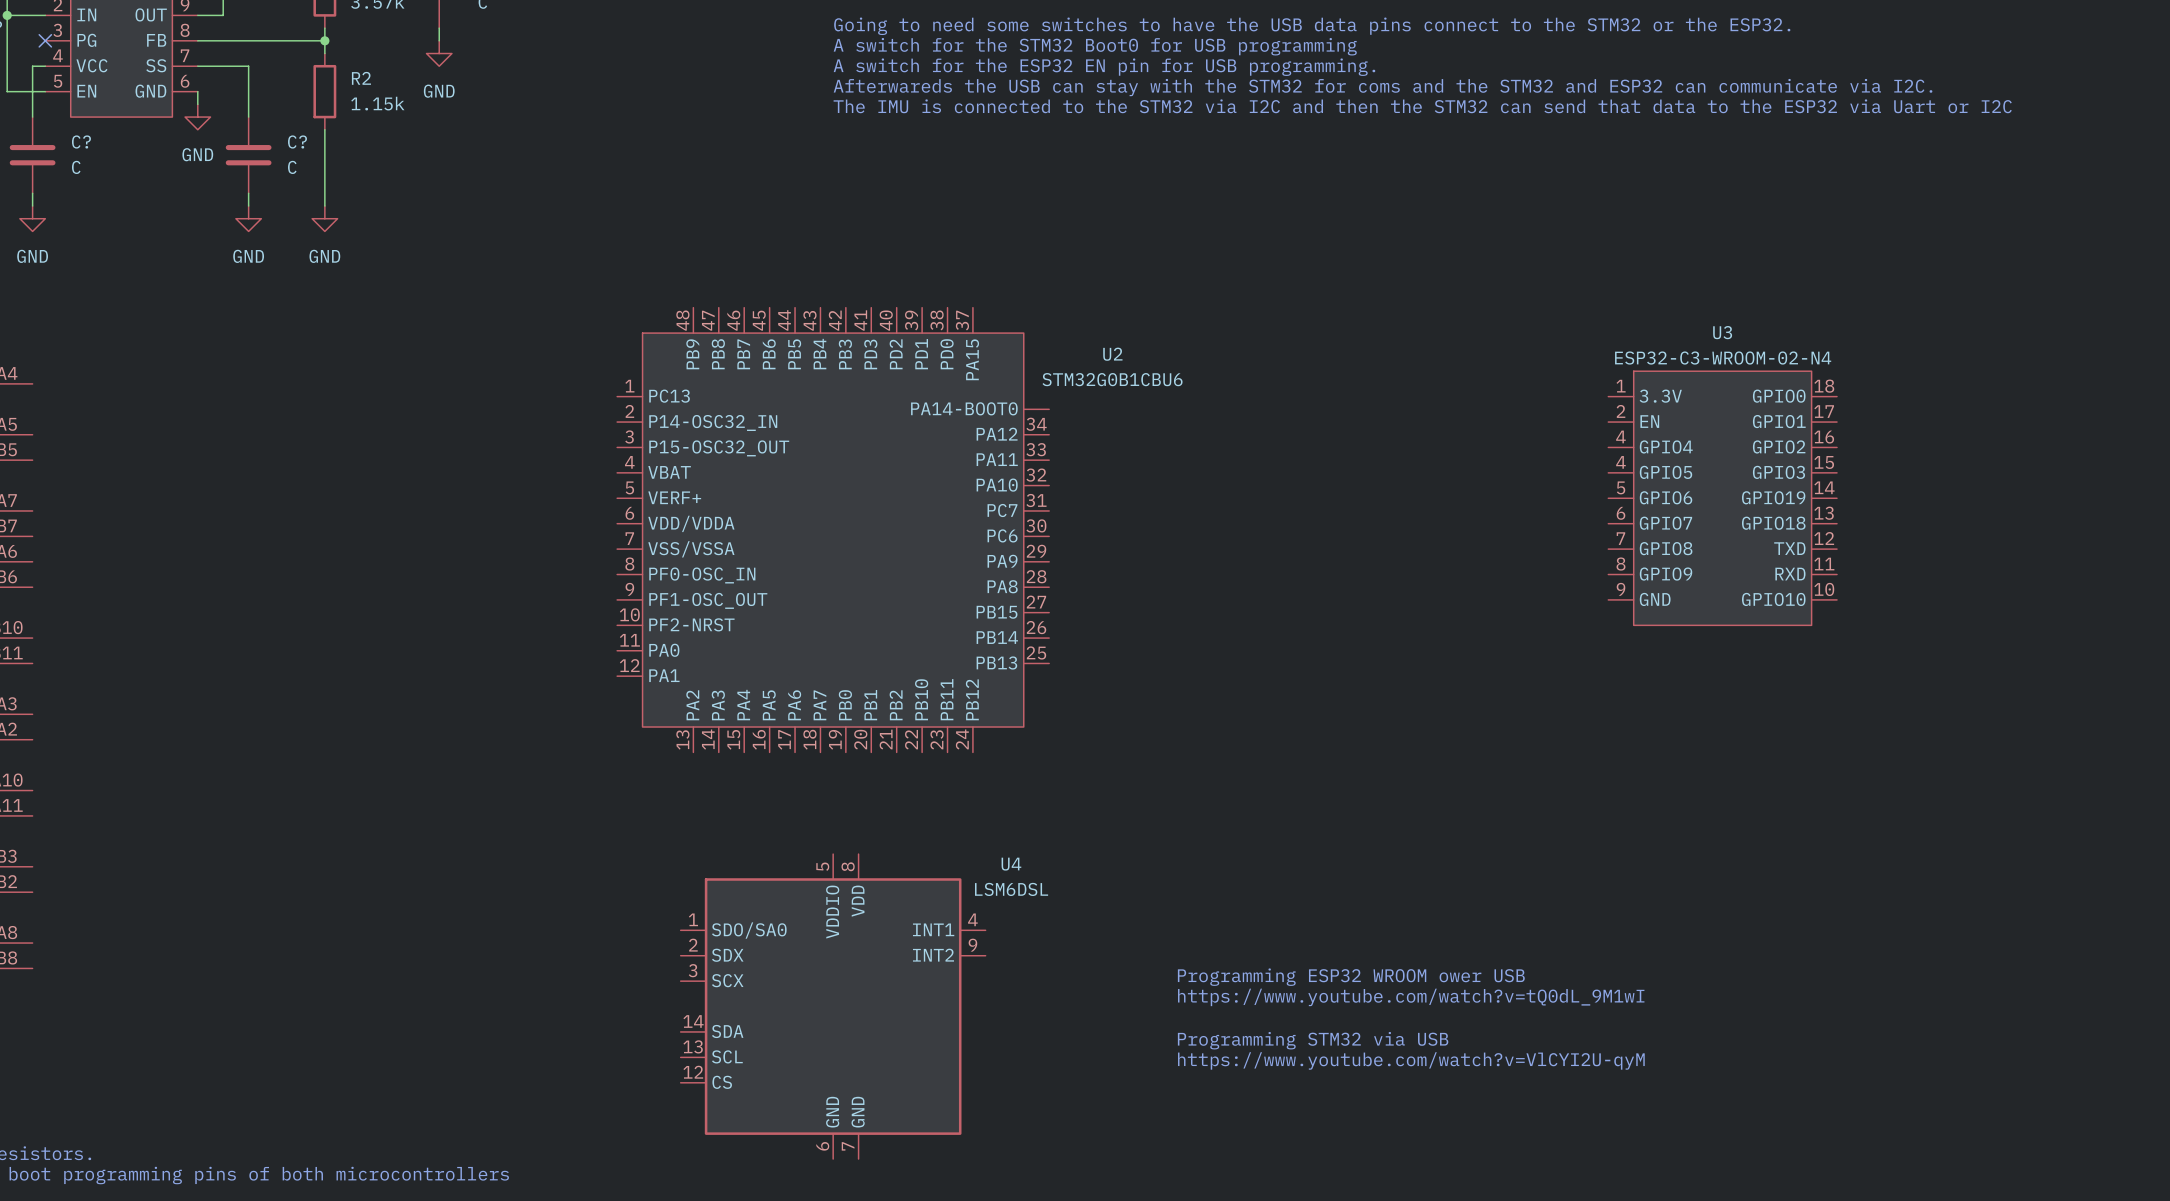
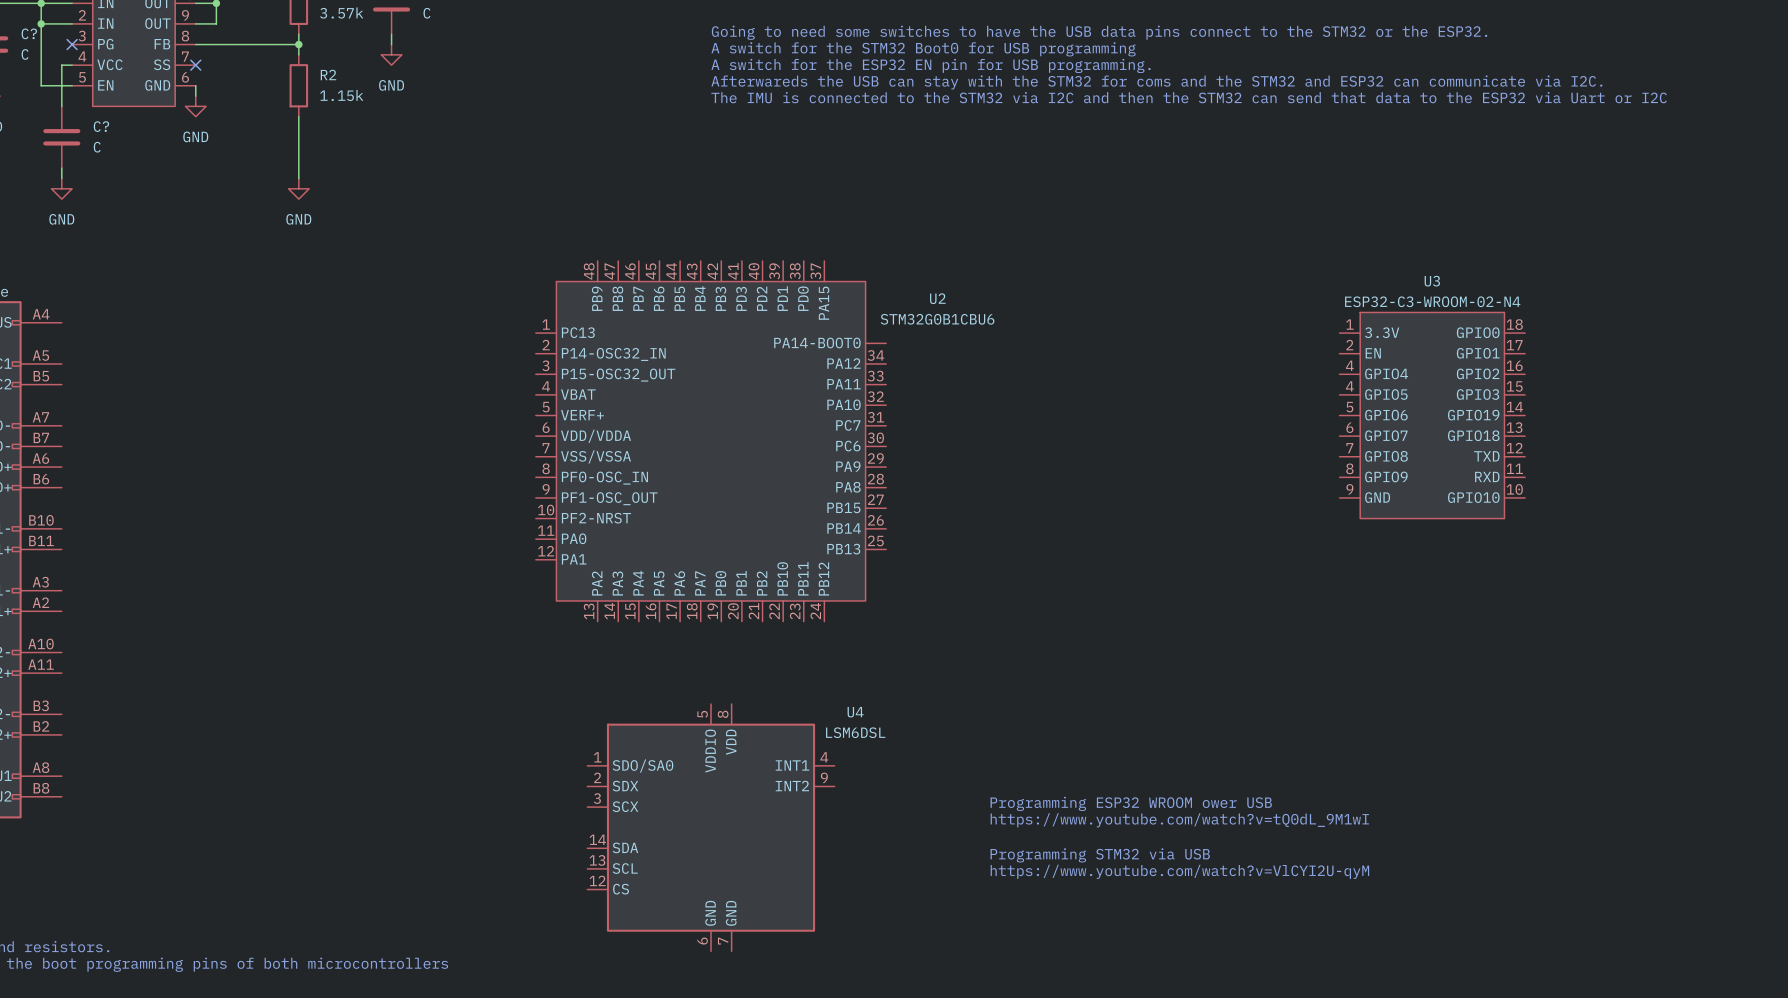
wire: (197, 66) (248, 66) (248, 117) -> none
no-connect mark: none -> (195, 65)
C?: C (248, 155) -> none
wire: (248, 193) (248, 206) -> none
power symbol: GND (248, 218) -> none

